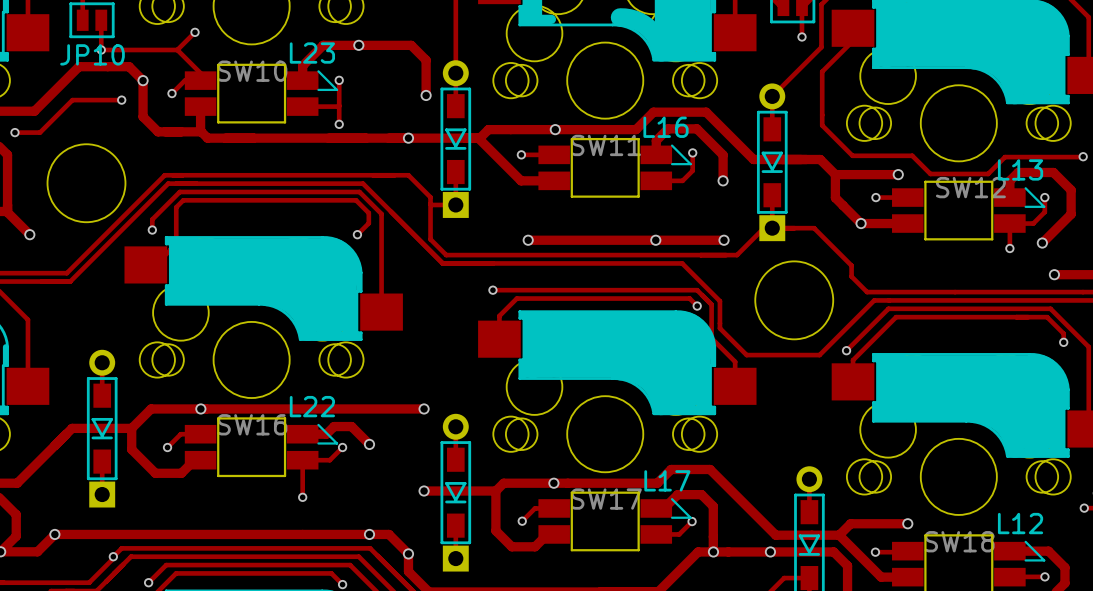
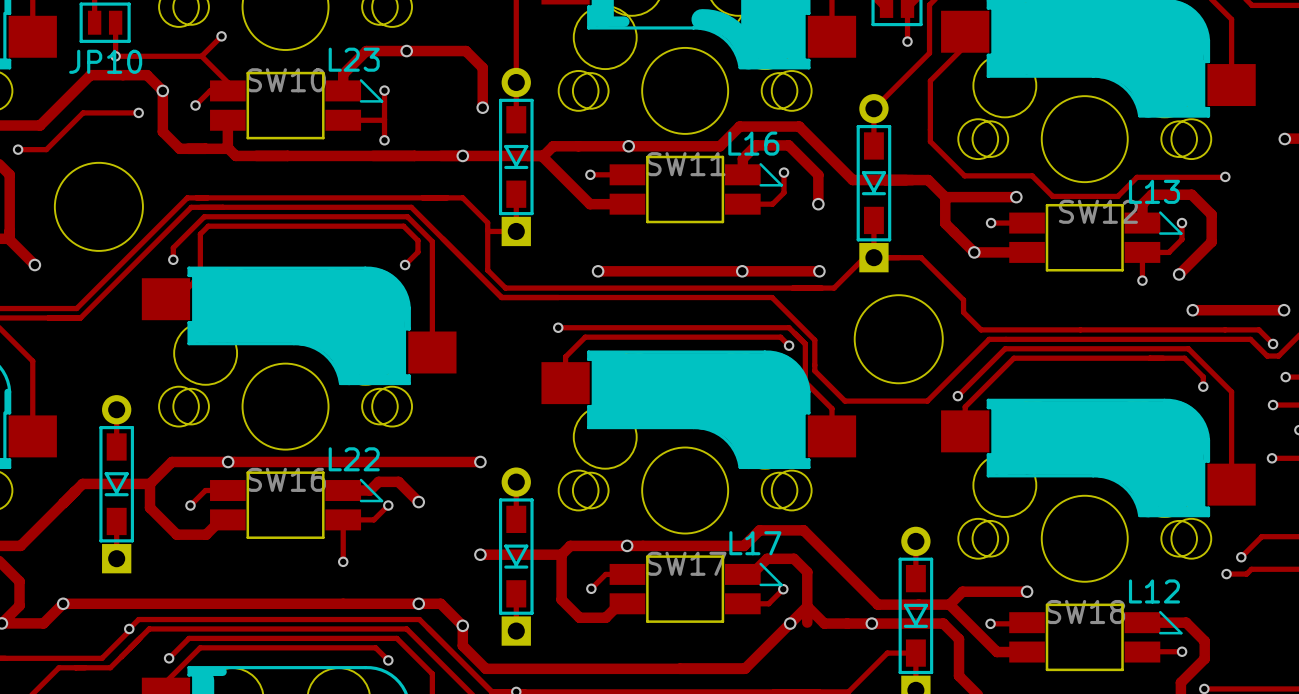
track: (698, 551) (728, 551) -> (790, 623) (807, 606) (824, 623)
via position: (713, 551) -> (790, 623)

